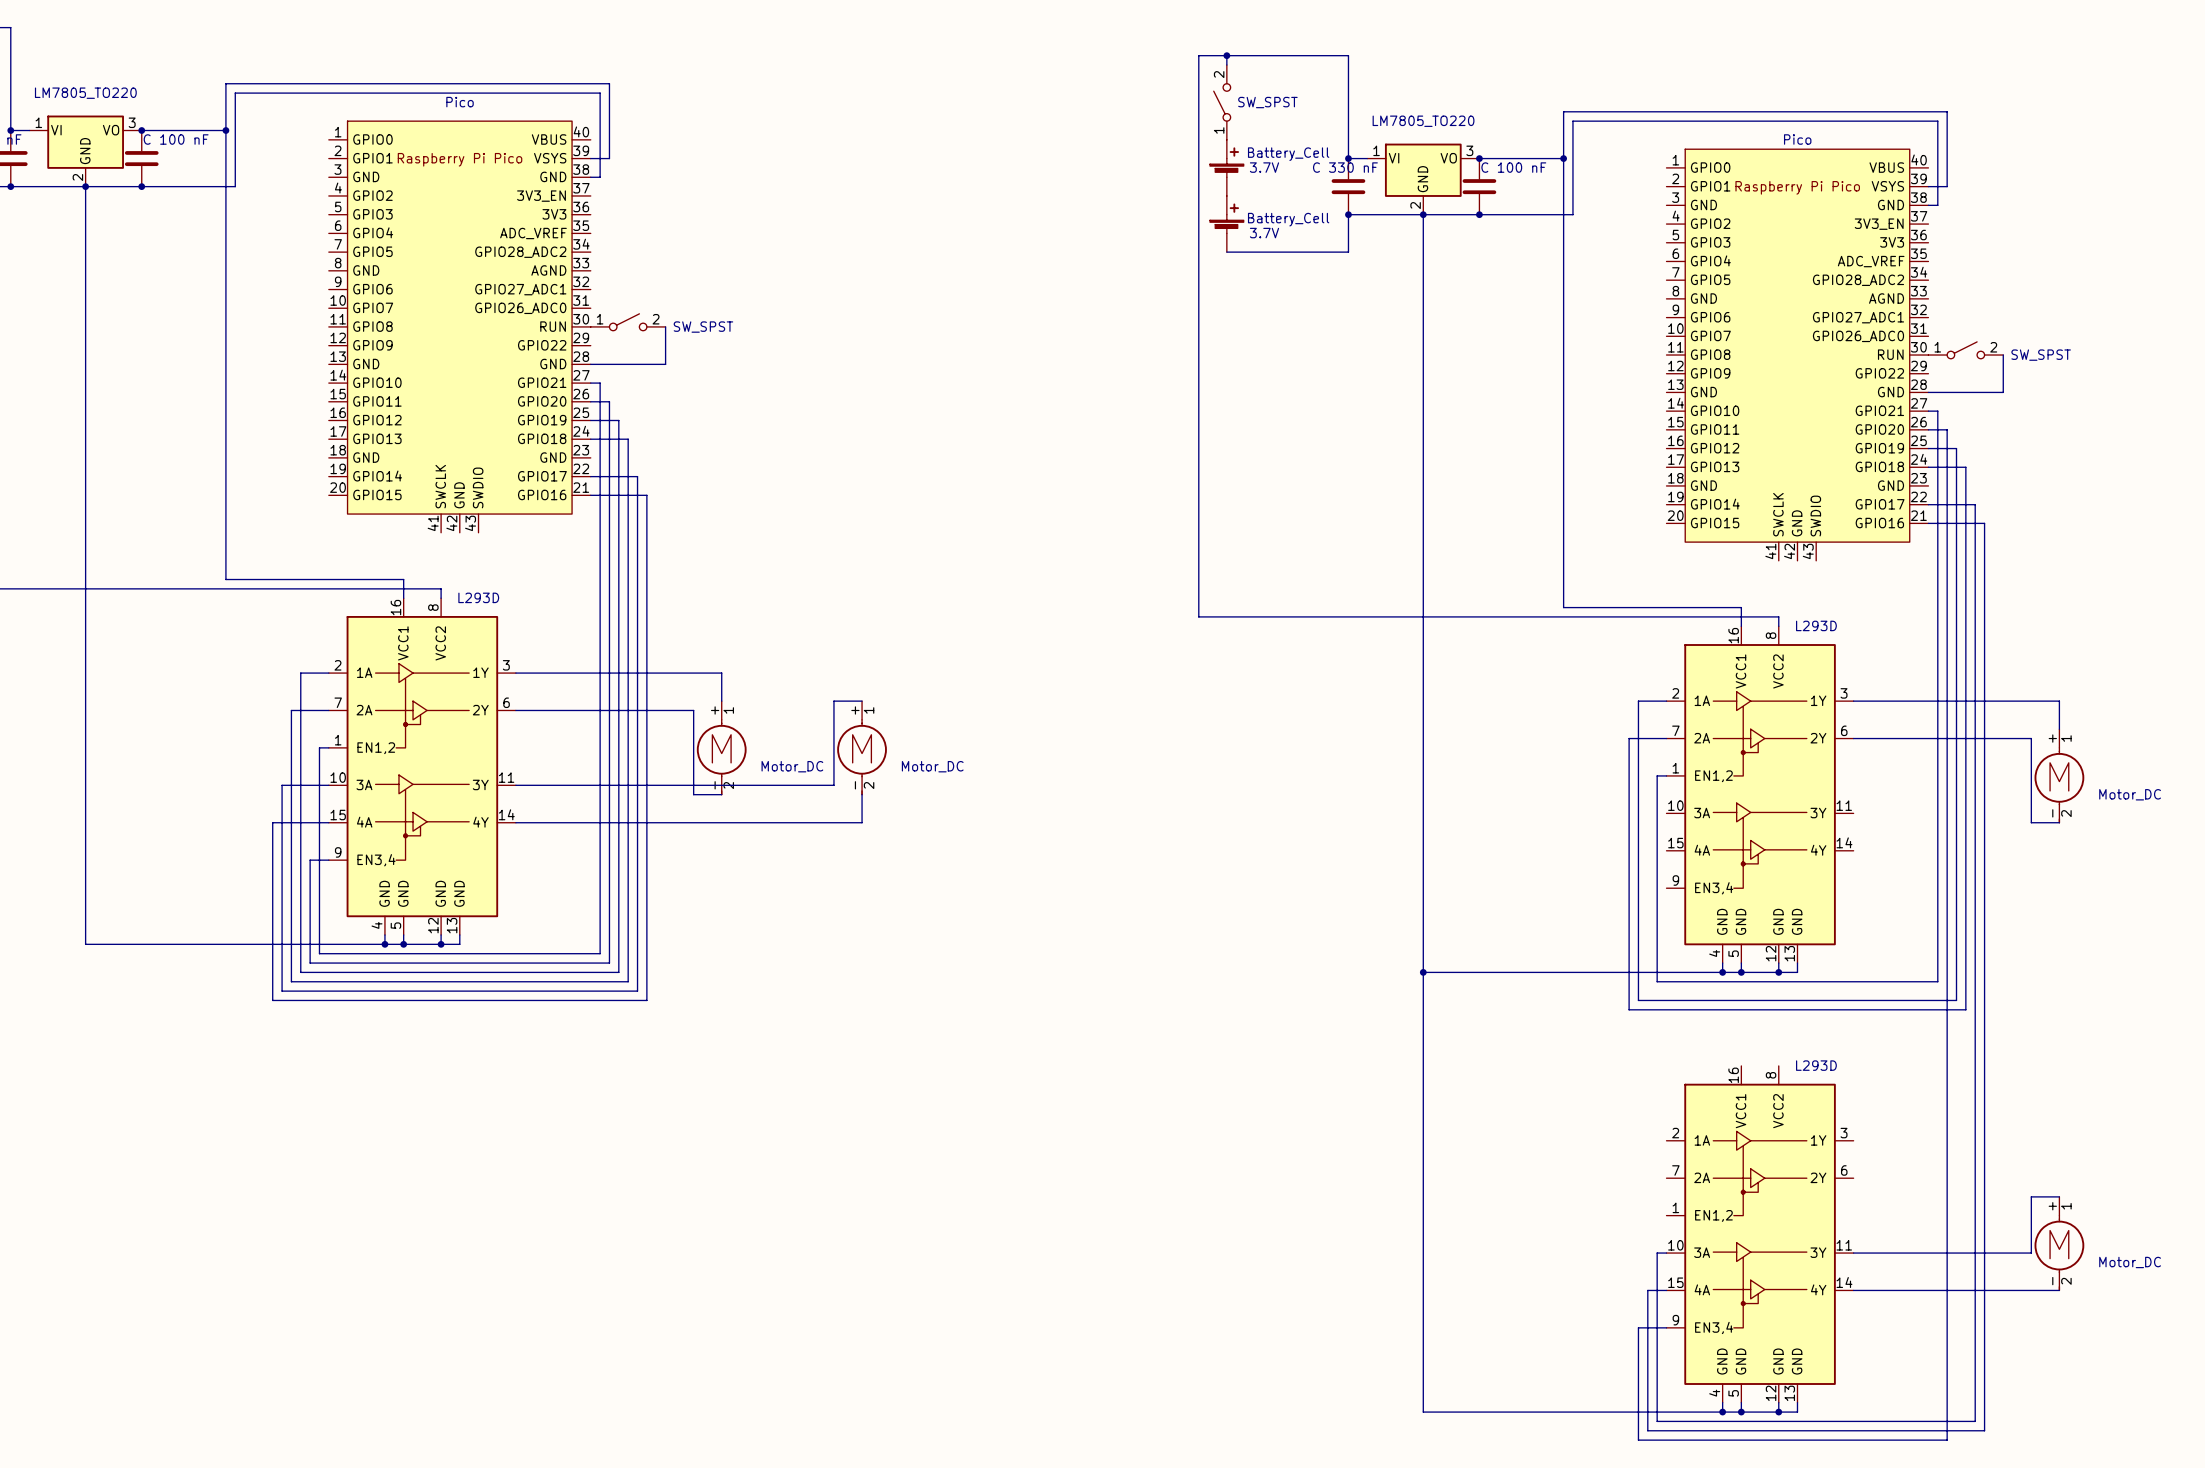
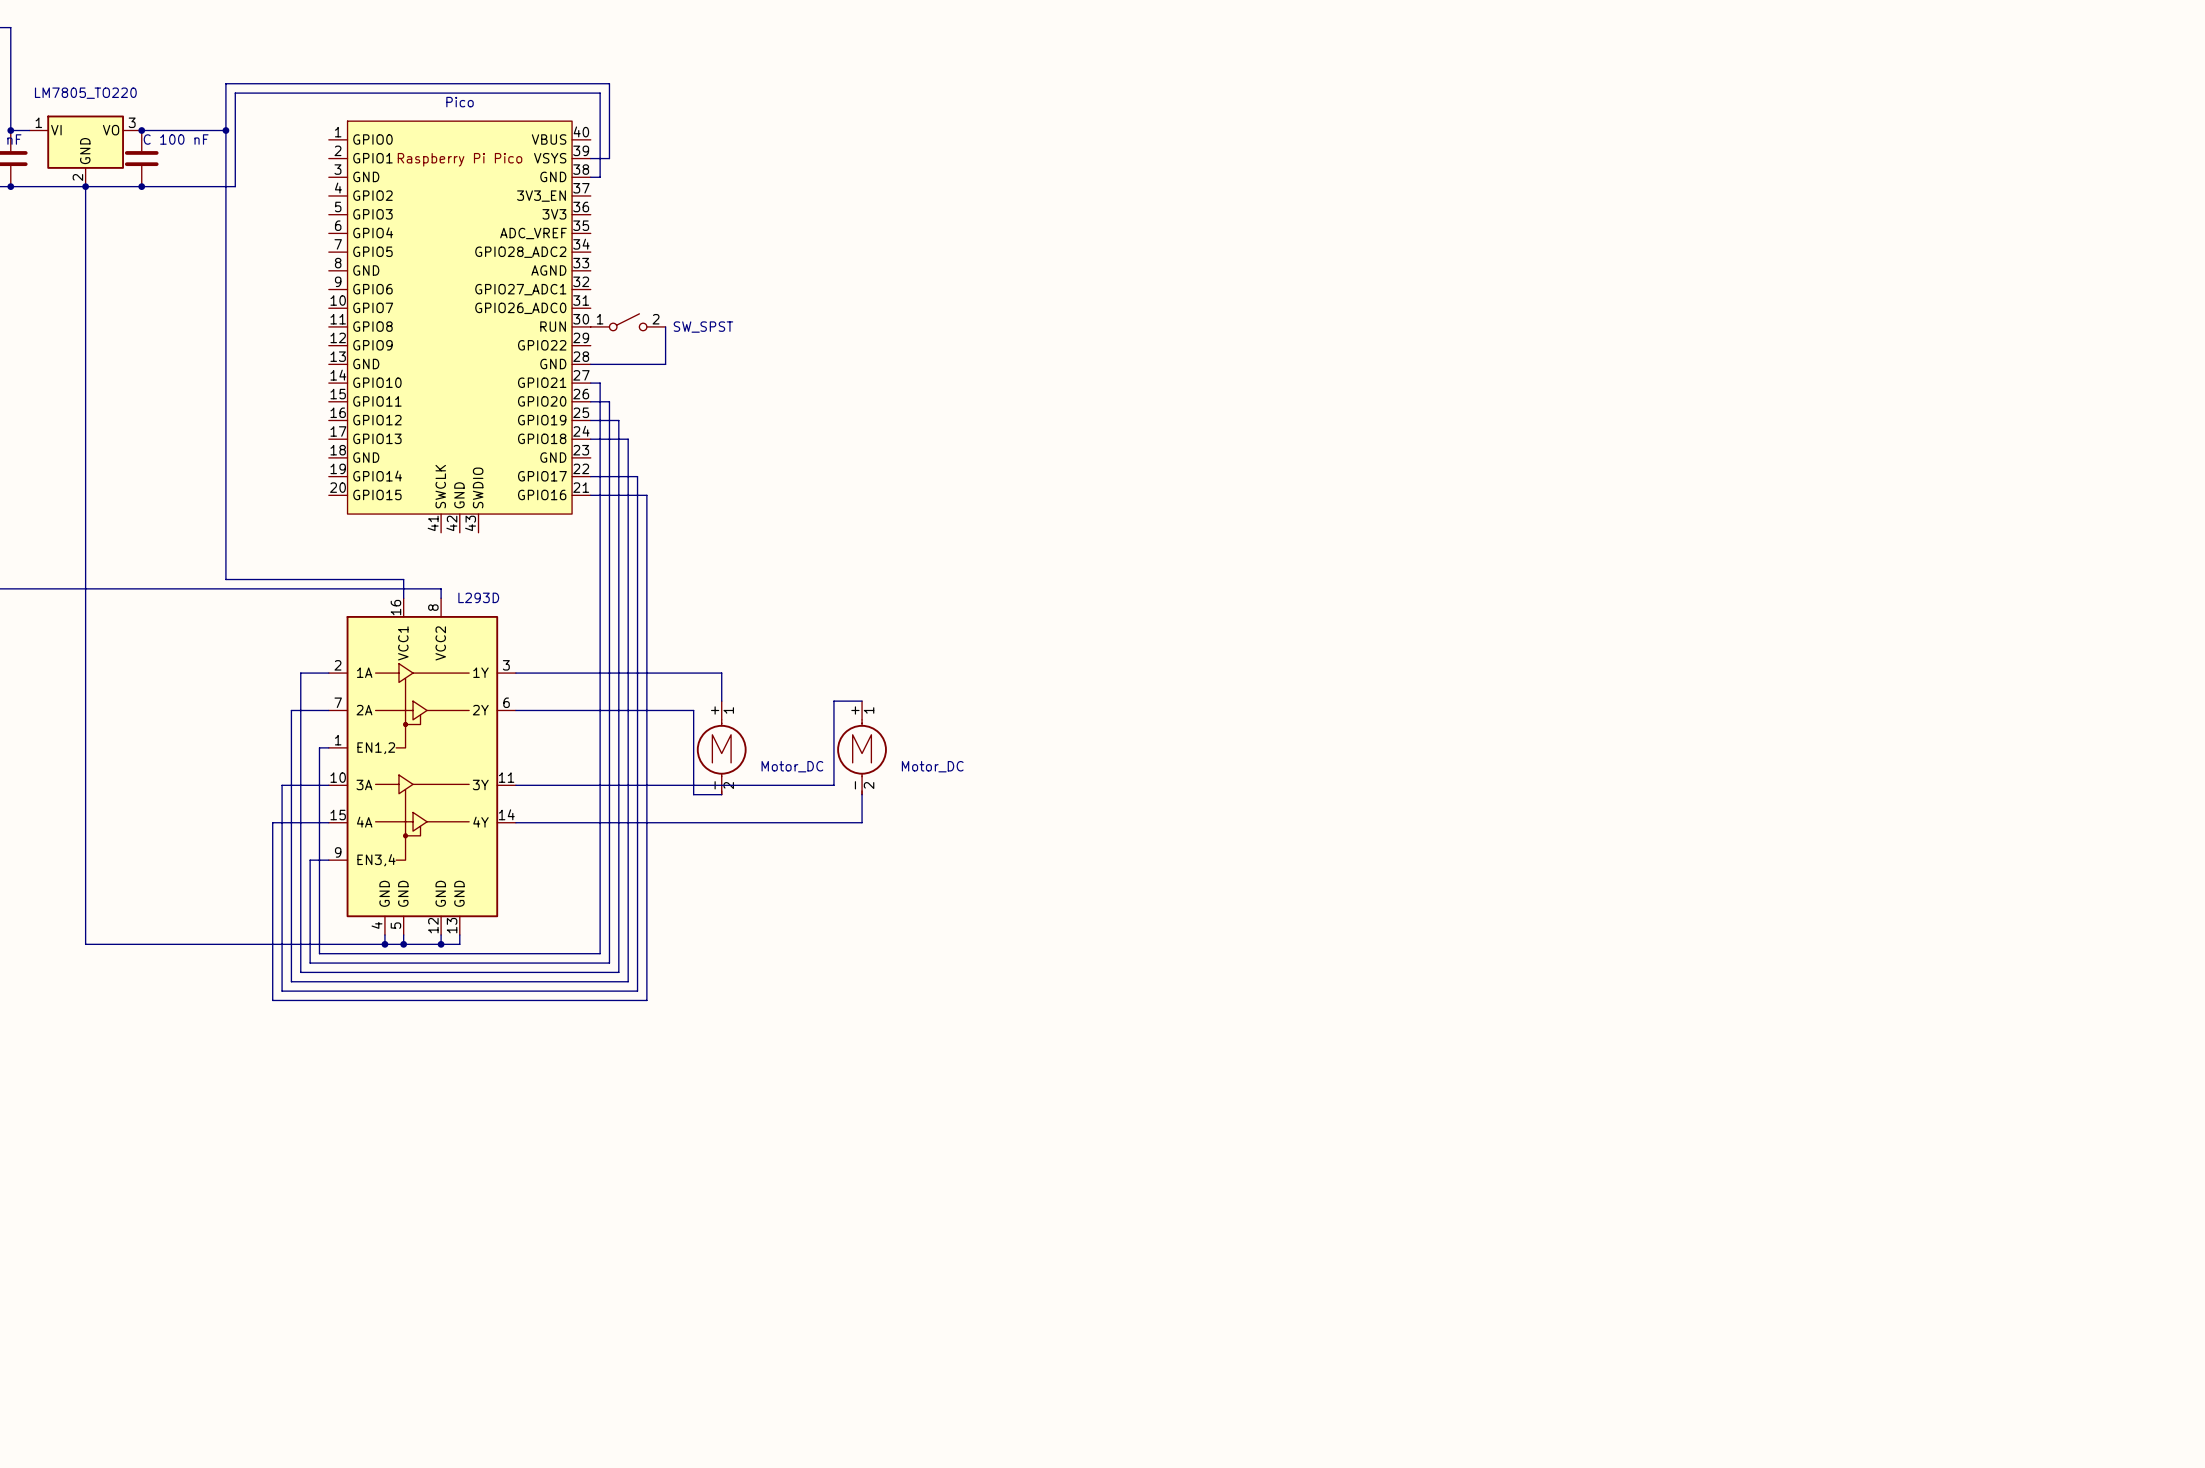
wire: (1226, 55) (1226, 65) -> none
junction: (1226, 55) -> none
part: SW_SPST (1222, 102) -> none
junction: (1348, 158) -> none
wire: (1367, 158) (1348, 158) (1348, 55) (1198, 55) (1198, 616) (1778, 616) (1778, 626) -> none
wire: (1479, 158) (1563, 158) -> none
junction: (1479, 158) -> none
junction: (1563, 158) -> none
part: Battery_Cell (1226, 167) -> none
part: LM7805_TO220 (1423, 179) -> none
part: C 330 nF (1348, 186) -> none
part: C 100 nF (1479, 186) -> none
wire: (1928, 186) (1947, 186) (1947, 111) (1563, 111) (1563, 607) (1741, 607) (1741, 626) -> none
wire: (1928, 205) (1937, 205) (1937, 121) (1572, 121) (1572, 214) (1348, 214) (1348, 252) (1226, 252) -> none
junction: (1348, 214) -> none
wire: (1423, 214) (1423, 1412) (1797, 1412) (1797, 1402) -> none
junction: (1423, 214) -> none
junction: (1479, 214) -> none
part: Battery_Cell (1226, 224) -> none
part: SW_SPST (1965, 350) -> none
part: Pico (1797, 355) -> none
wire: (2003, 355) (2003, 392) (1928, 392) -> none
wire: (1928, 411) (1937, 411) (1937, 981) (1657, 981) (1657, 775) (1666, 775) -> none
wire: (1928, 429) (1947, 429) (1947, 1440) (1638, 1440) (1638, 1327) (1666, 1327) -> none
wire: (1928, 448) (1956, 448) (1956, 1000) (1638, 1000) (1638, 701) (1666, 701) -> none
wire: (1928, 467) (1965, 467) (1965, 1009) (1629, 1009) (1629, 738) (1666, 738) -> none
wire: (1928, 504) (1975, 504) (1975, 1421) (1657, 1421) (1657, 1253) (1666, 1253) -> none
wire: (1928, 523) (1984, 523) (1984, 1430) (1647, 1430) (1647, 1290) (1666, 1290) -> none
wire: (1853, 701) (2059, 701) (2059, 729) -> none
wire: (1853, 738) (2031, 738) (2031, 822) (2059, 822) -> none
part: Motor_DC (2059, 775) -> none
part: L293D (1760, 794) -> none
wire: (1722, 963) (1722, 972) -> none
wire: (1741, 963) (1741, 972) -> none
wire: (1778, 963) (1778, 972) -> none
wire: (1797, 963) (1797, 972) (1423, 972) -> none
junction: (1423, 972) -> none
junction: (1722, 972) -> none
junction: (1741, 972) -> none
junction: (1778, 972) -> none
wire: (2059, 1196) (2031, 1196) (2031, 1253) (1853, 1253) -> none
part: L293D (1760, 1234) -> none
part: Motor_DC (2059, 1243) -> none
wire: (1853, 1290) (2059, 1290) -> none
wire: (1722, 1402) (1722, 1412) -> none
wire: (1741, 1402) (1741, 1412) -> none
wire: (1778, 1402) (1778, 1412) -> none
junction: (1722, 1412) -> none
junction: (1741, 1412) -> none
junction: (1778, 1412) -> none

